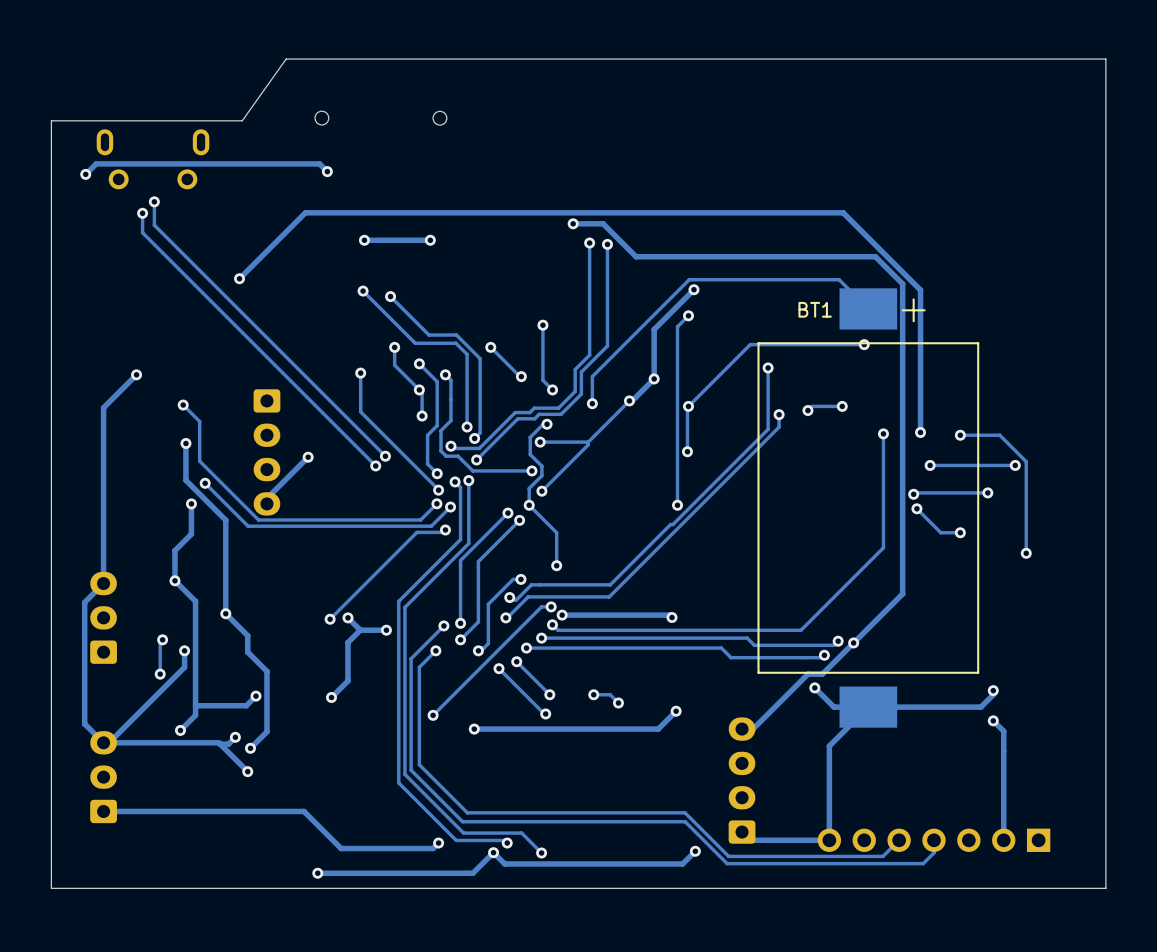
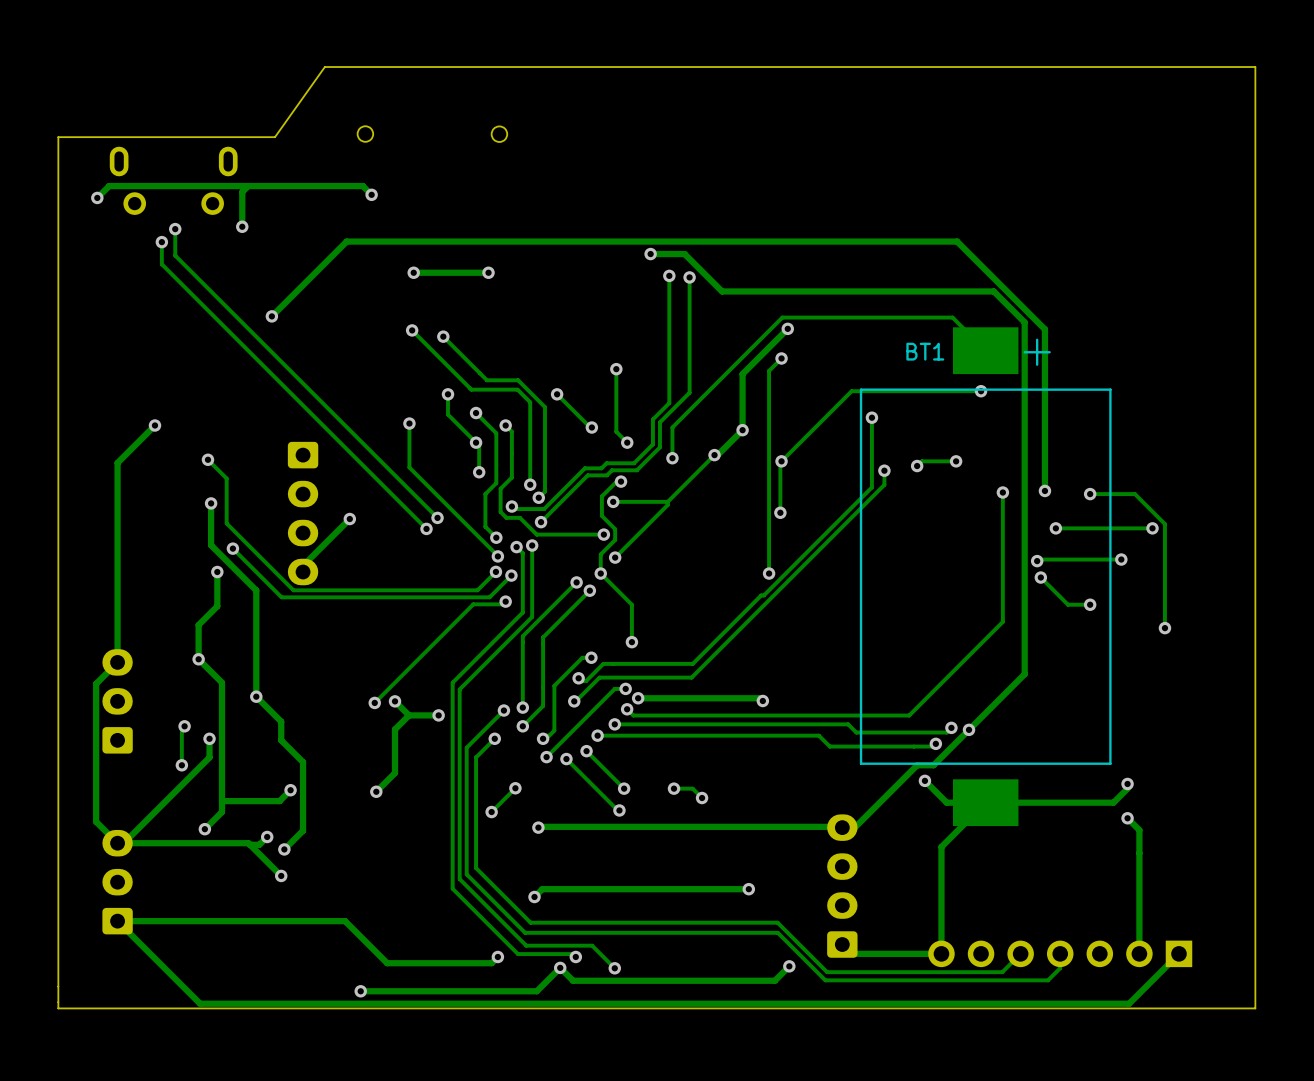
track: none -> (248, 186) (242, 192) (242, 226)
via: none -> (242, 226)
track: (481, 666) (454, 694) -> none
via: none -> (546, 757)
via: none -> (515, 788)
track: (676, 711) (658, 729) (474, 729) -> none
via position: (676, 711) -> (748, 889)
track: none -> (542, 826) (842, 827)
track: none -> (748, 889) (542, 889) (534, 896)
via: none -> (534, 896)
track: none -> (117, 921) (200, 1003) (1129, 1003) (1178, 953)

